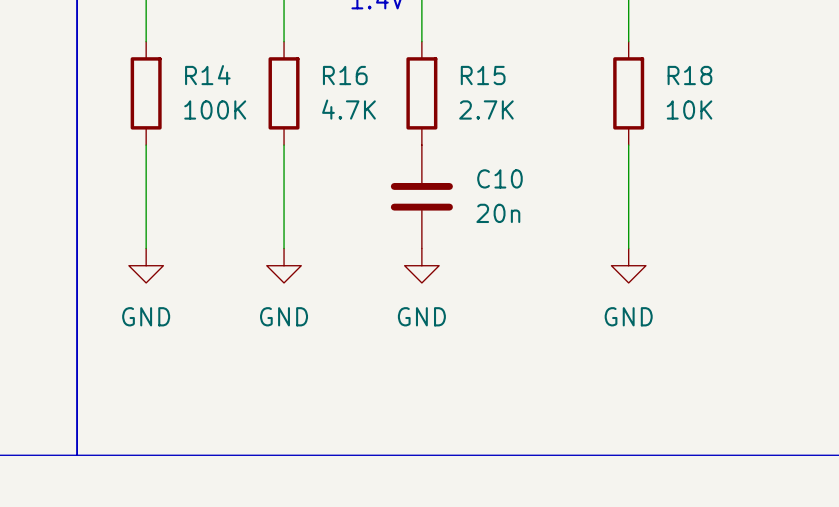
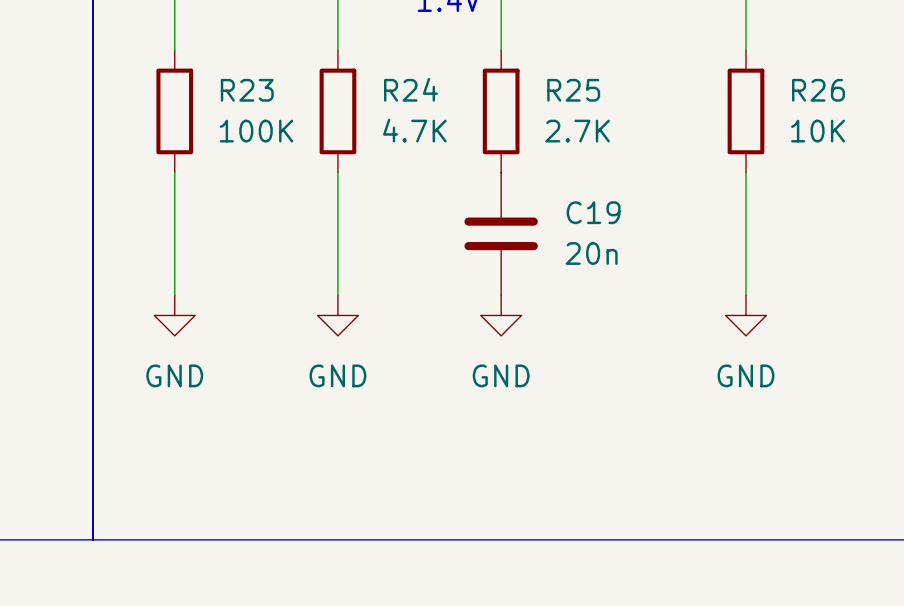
R14 name: R14 (207, 75) -> R23 (247, 90)
R16 name: R16 (345, 75) -> R24 (410, 89)
R15 name: R15 (483, 75) -> R25 (573, 90)
R18 name: R18 (689, 75) -> R26 (818, 90)
C10 name: C10 (499, 178) -> C19 (593, 212)

